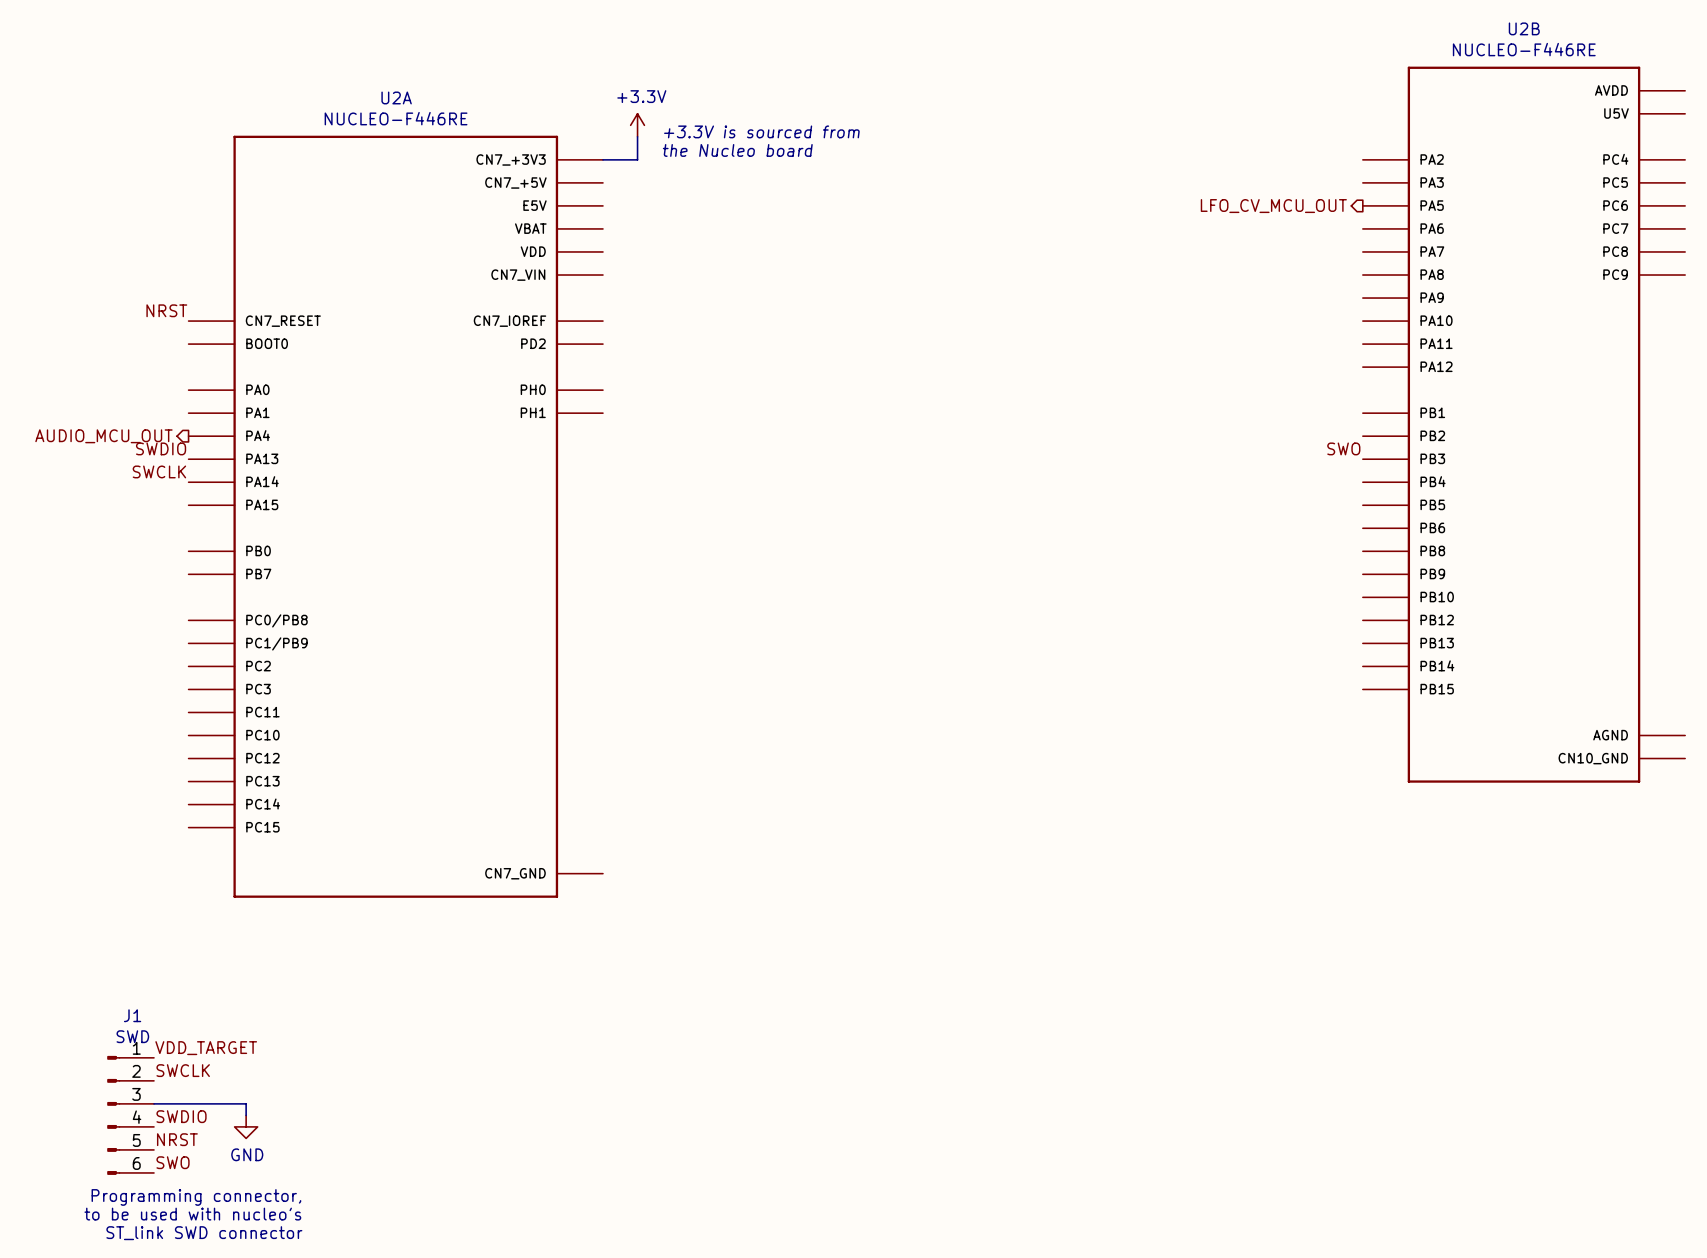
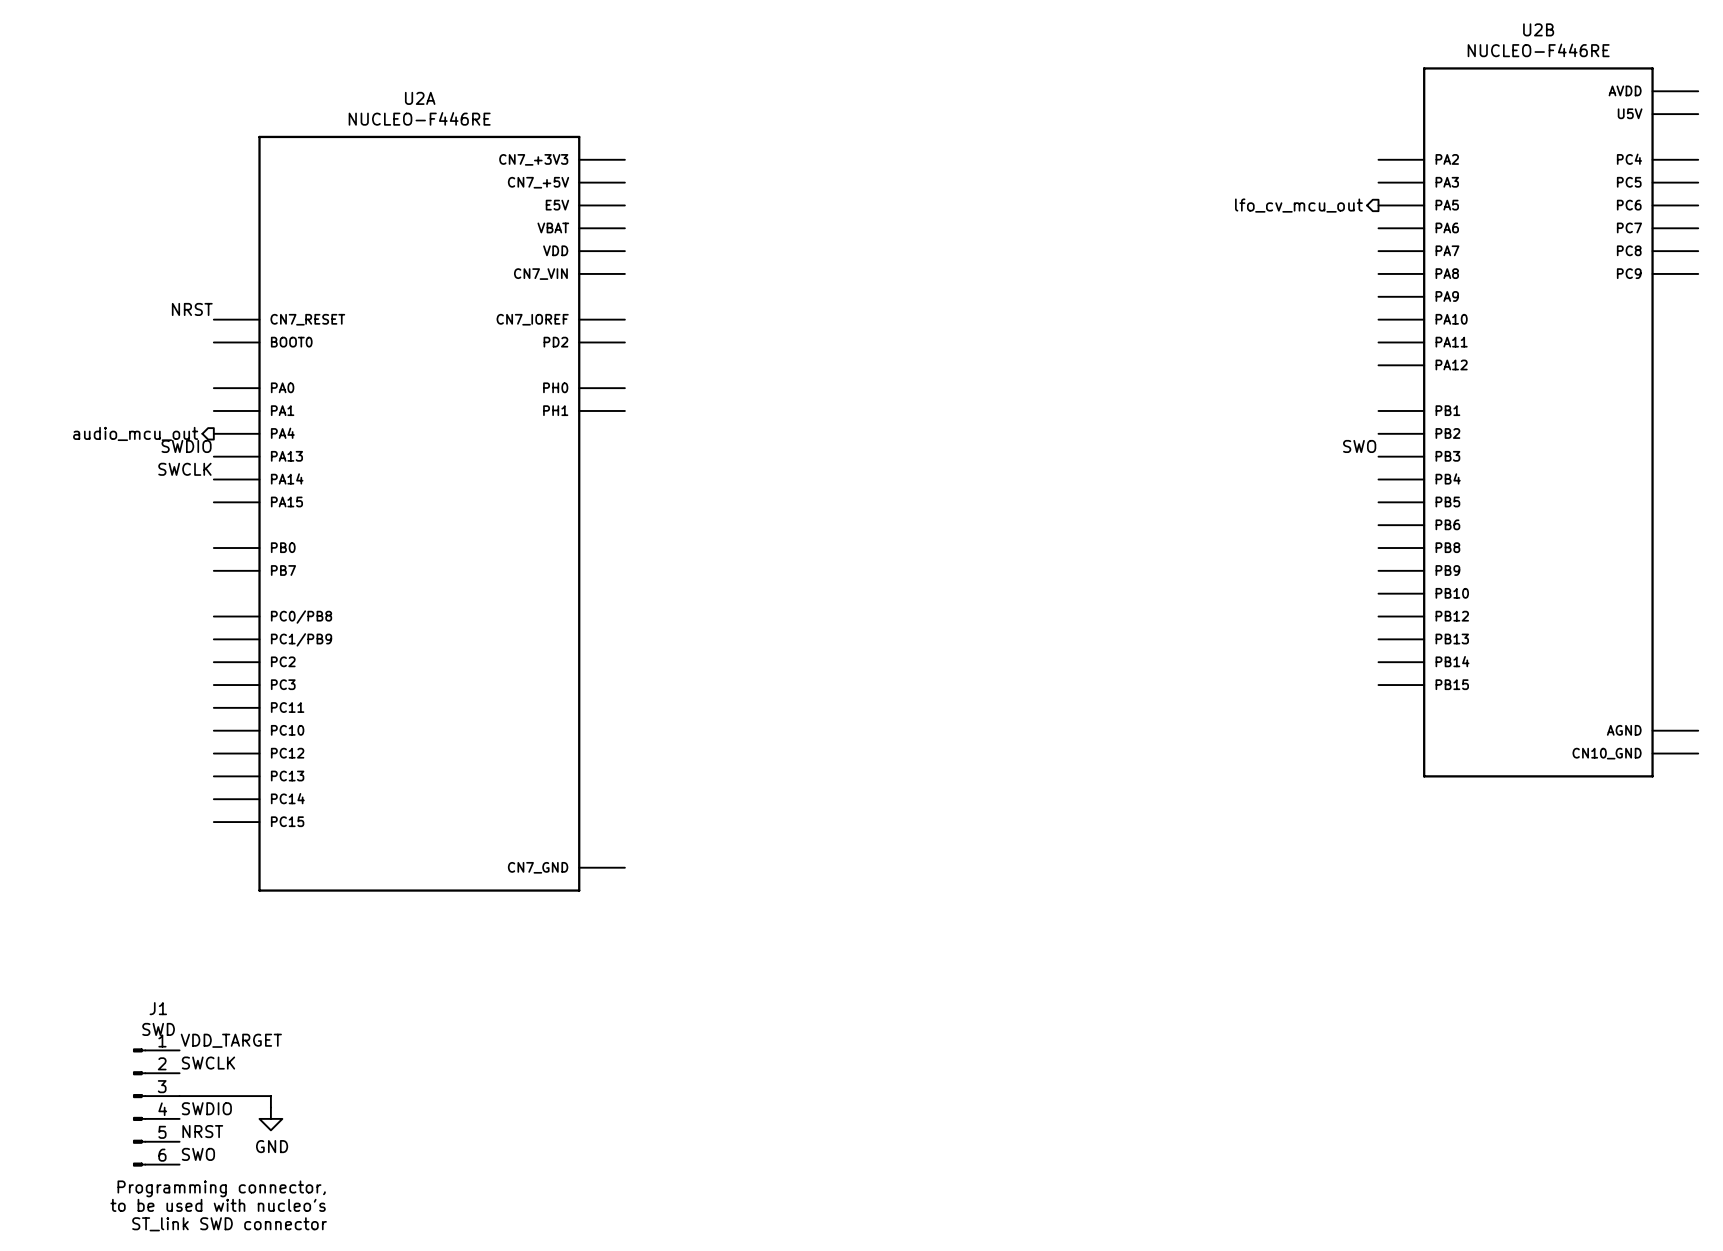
power symbol: +3.3V (637, 125) -> none
text: +3.3V is sourced from (761, 131) -> none
wire: (637, 136) (637, 159) (603, 159) -> none
text: the Nucleo board (737, 150) -> none
hierarchical label: LFO_CV_MCU_OUT (1273, 206) -> lfo_cv_mcu_out (1298, 205)
hierarchical label: AUDIO_MCU_OUT (103, 436) -> audio_mcu_out (135, 433)

